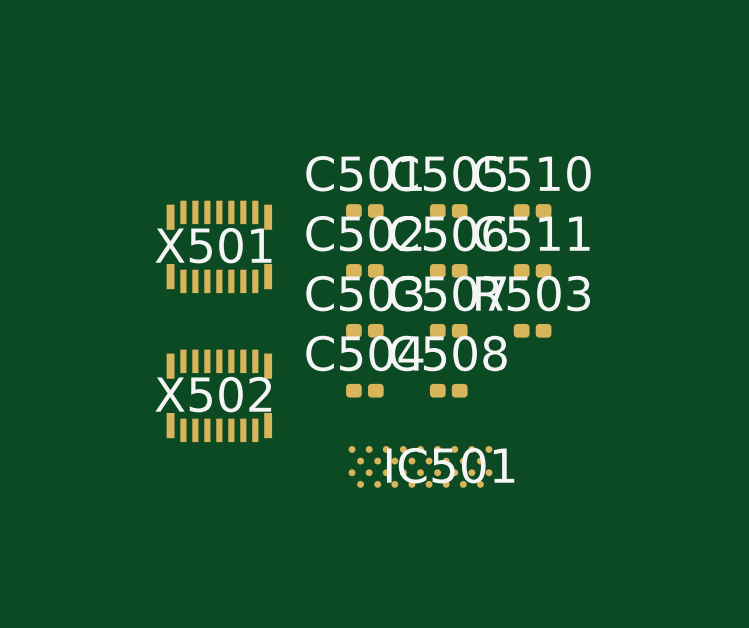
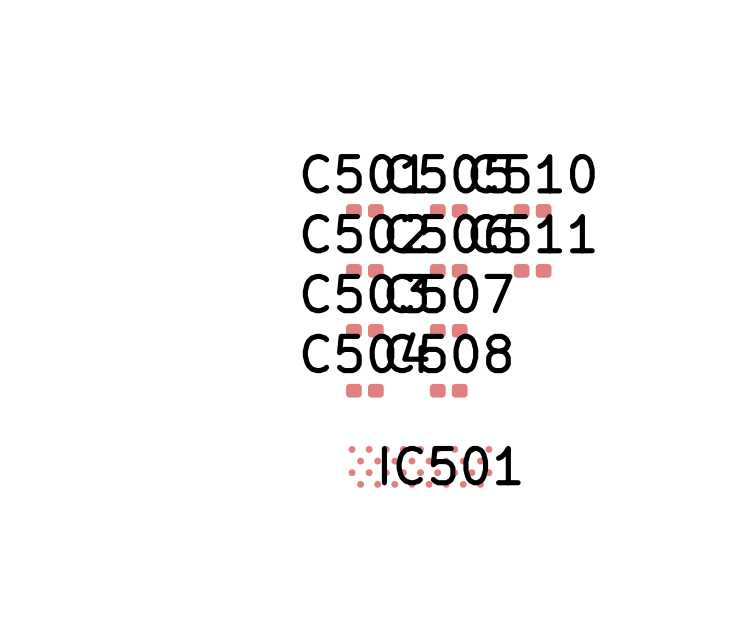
X501: (219, 246) -> none
R503: (532, 330) -> none
X502: (219, 395) -> none

